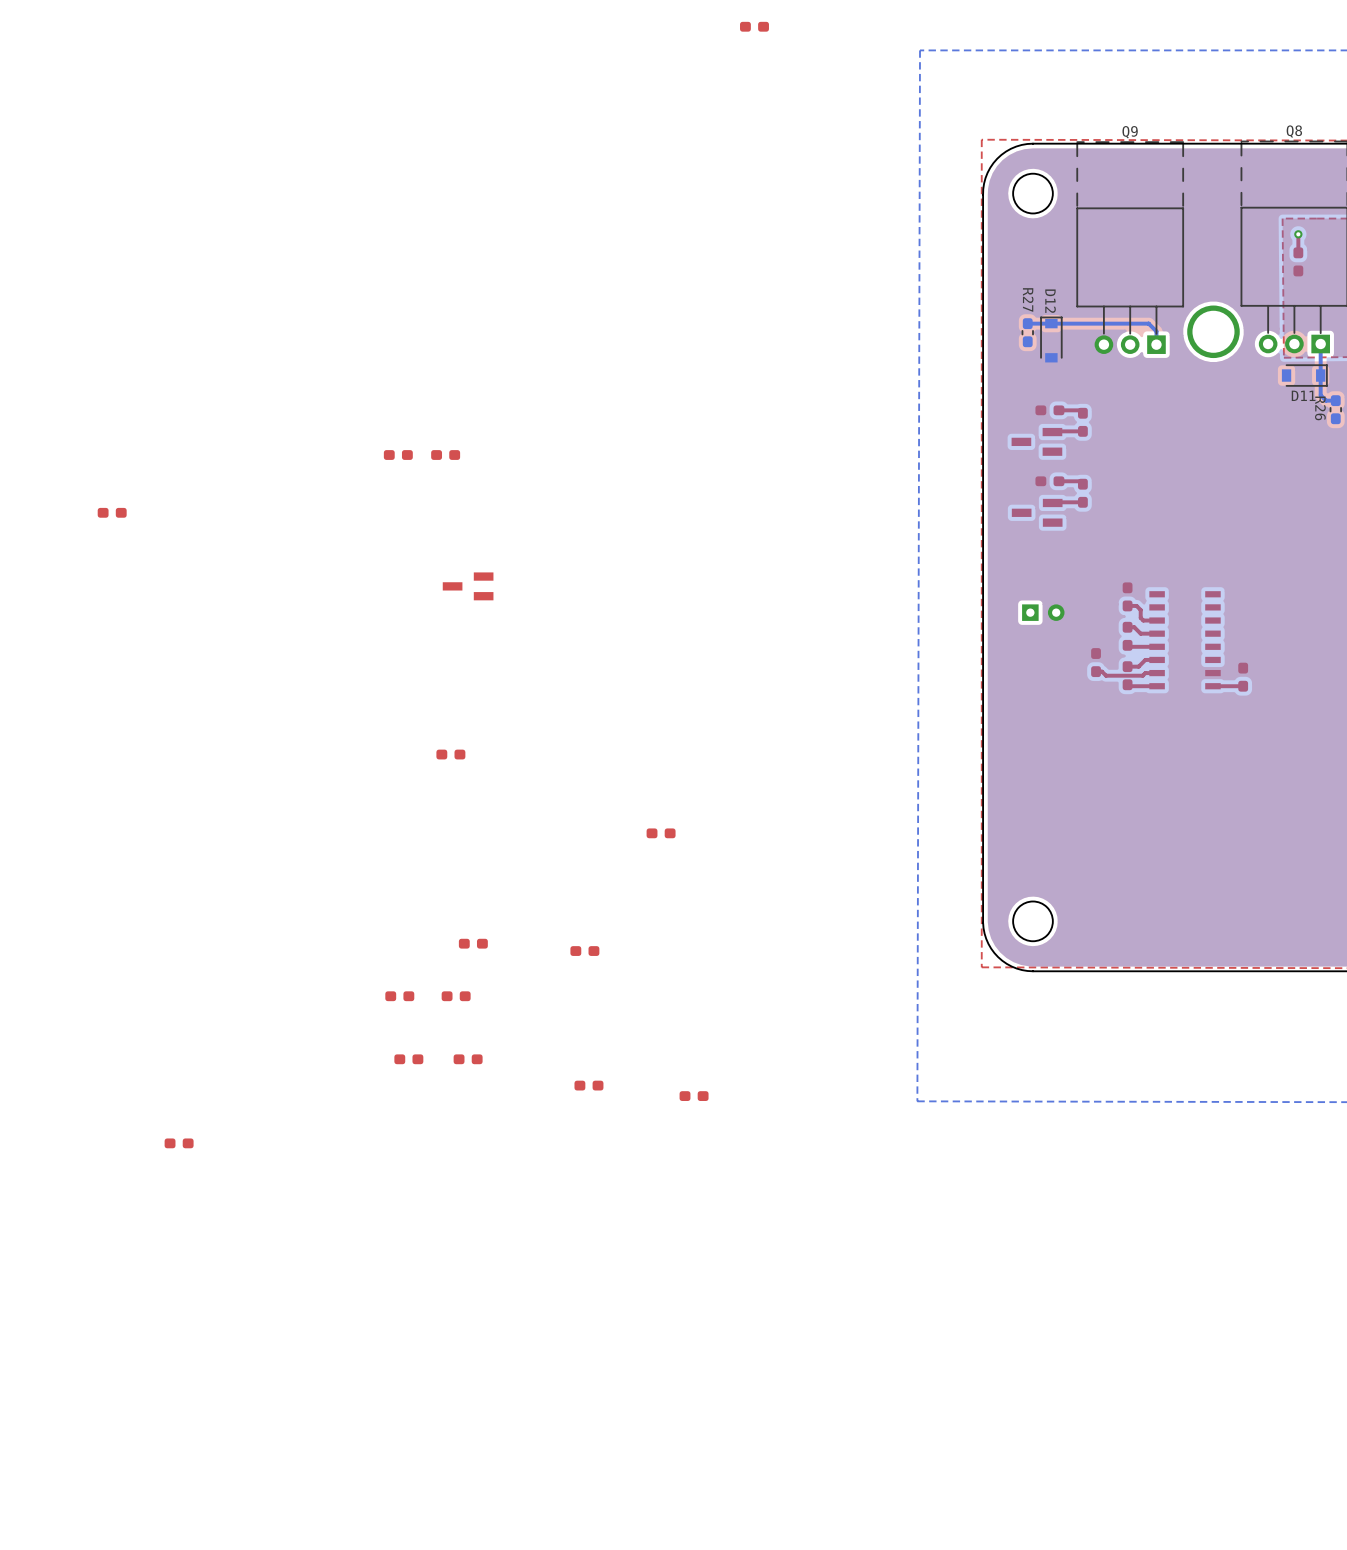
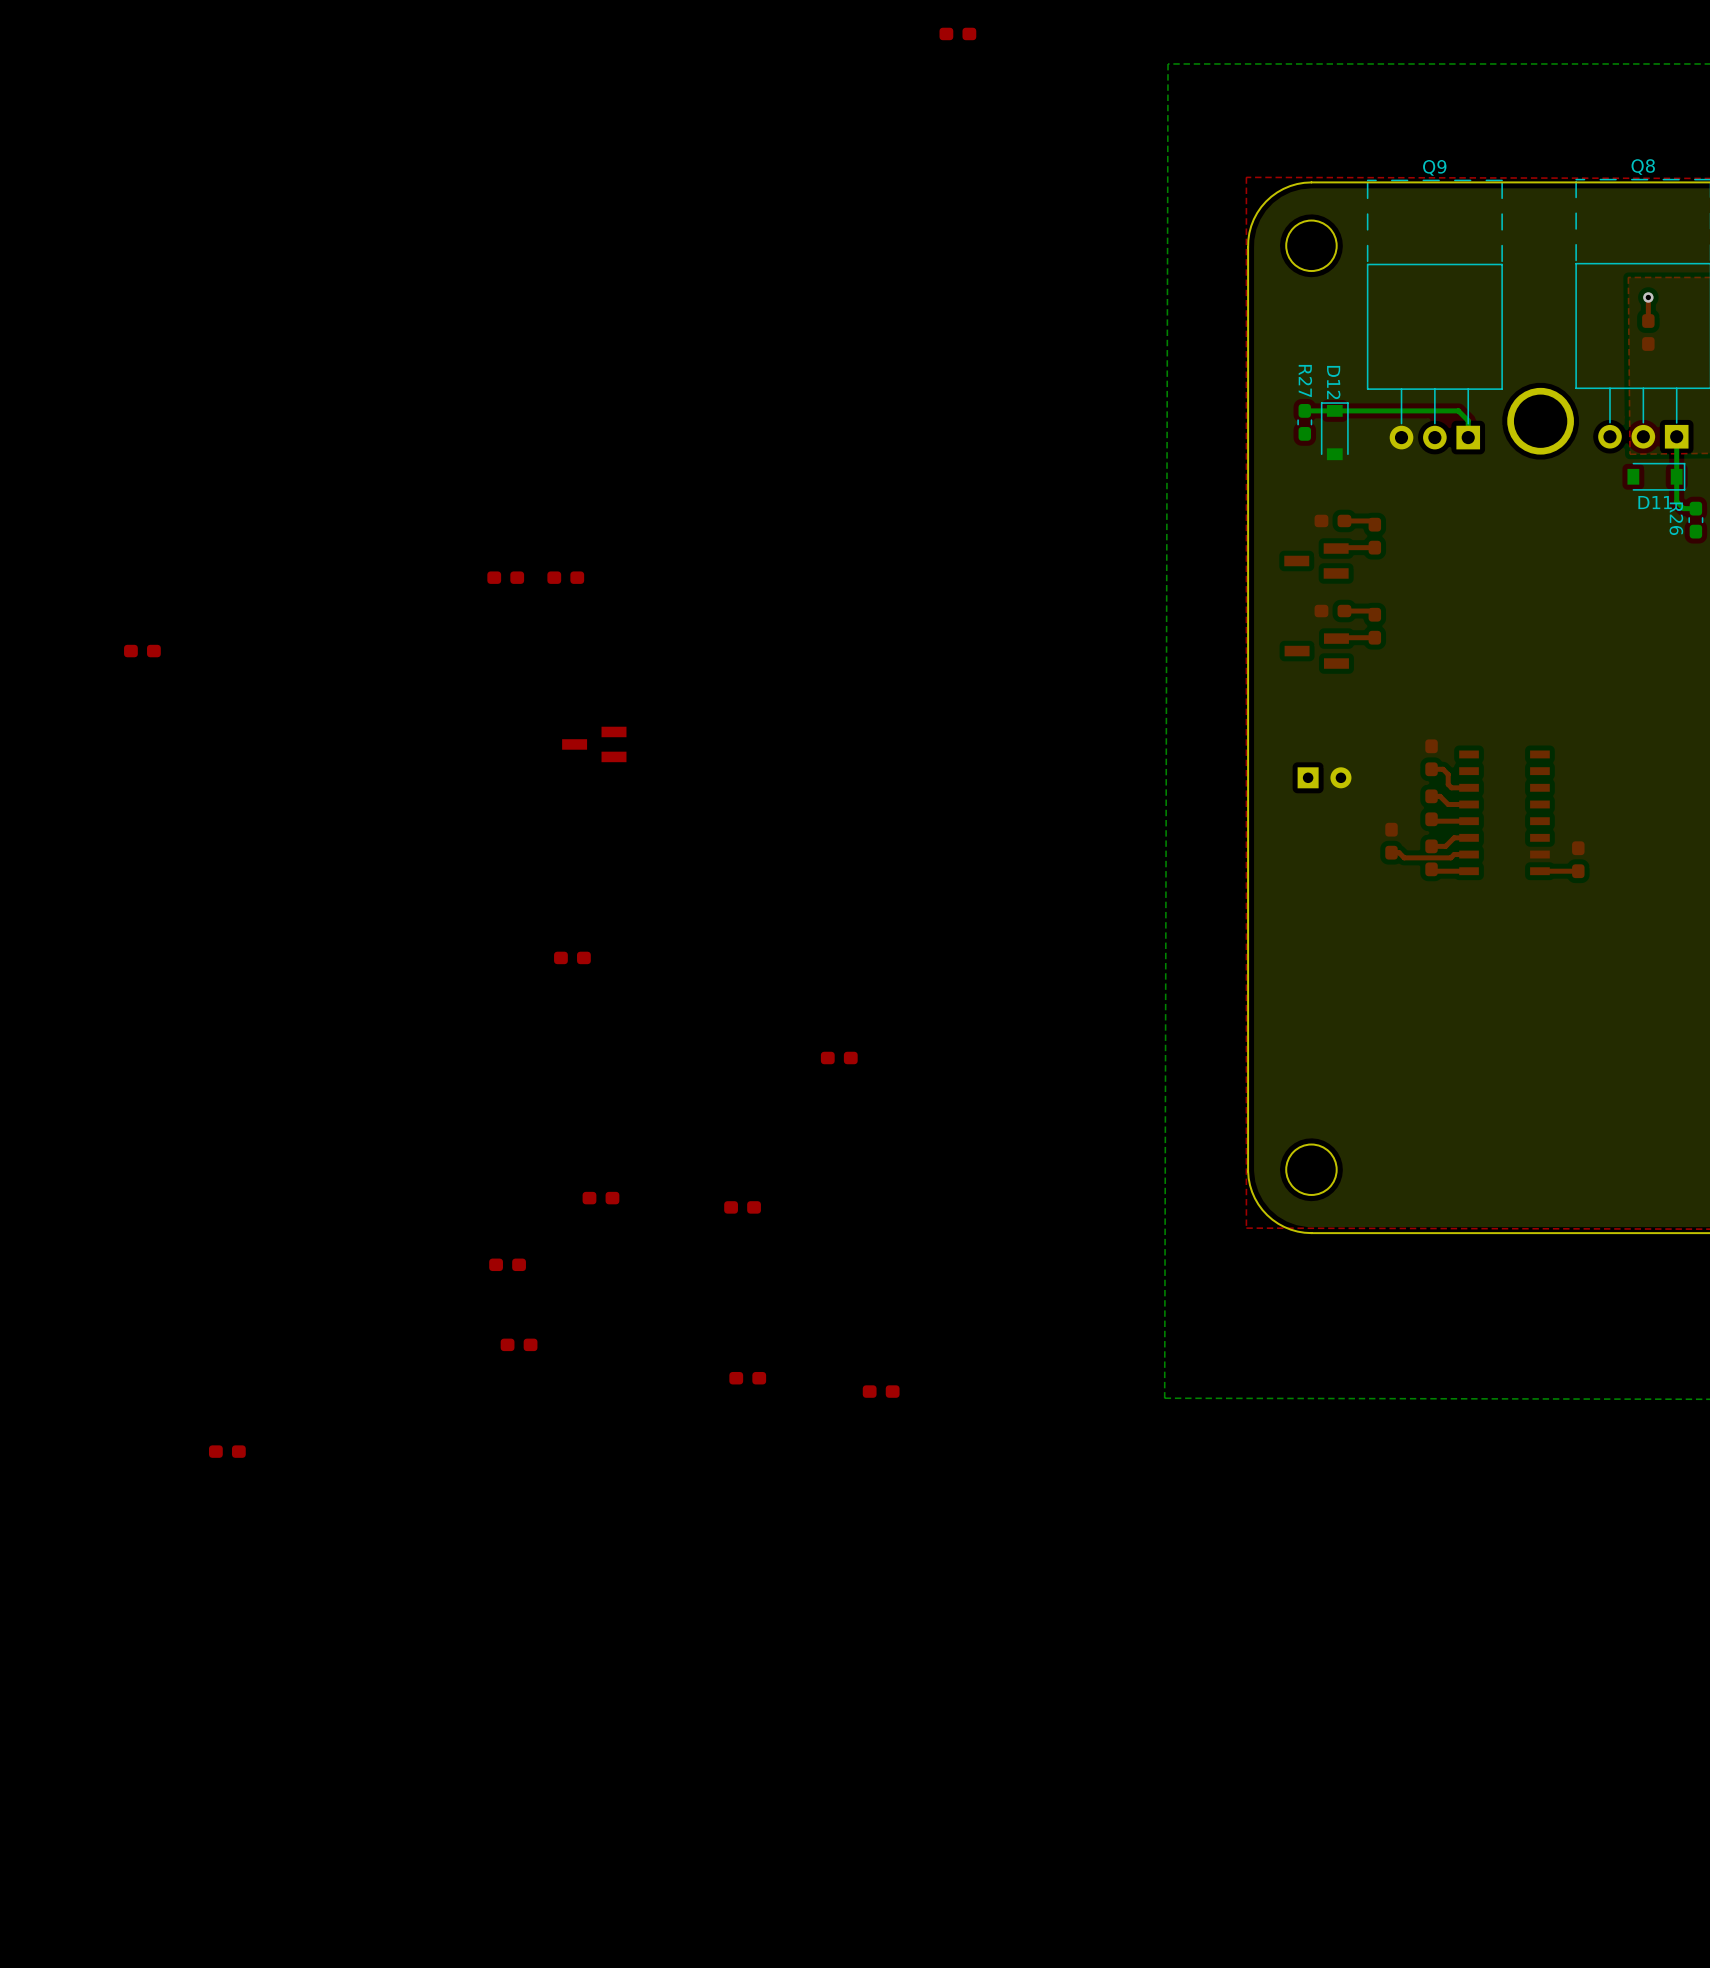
part: (456, 996) -> none
part: (468, 1059) -> none

